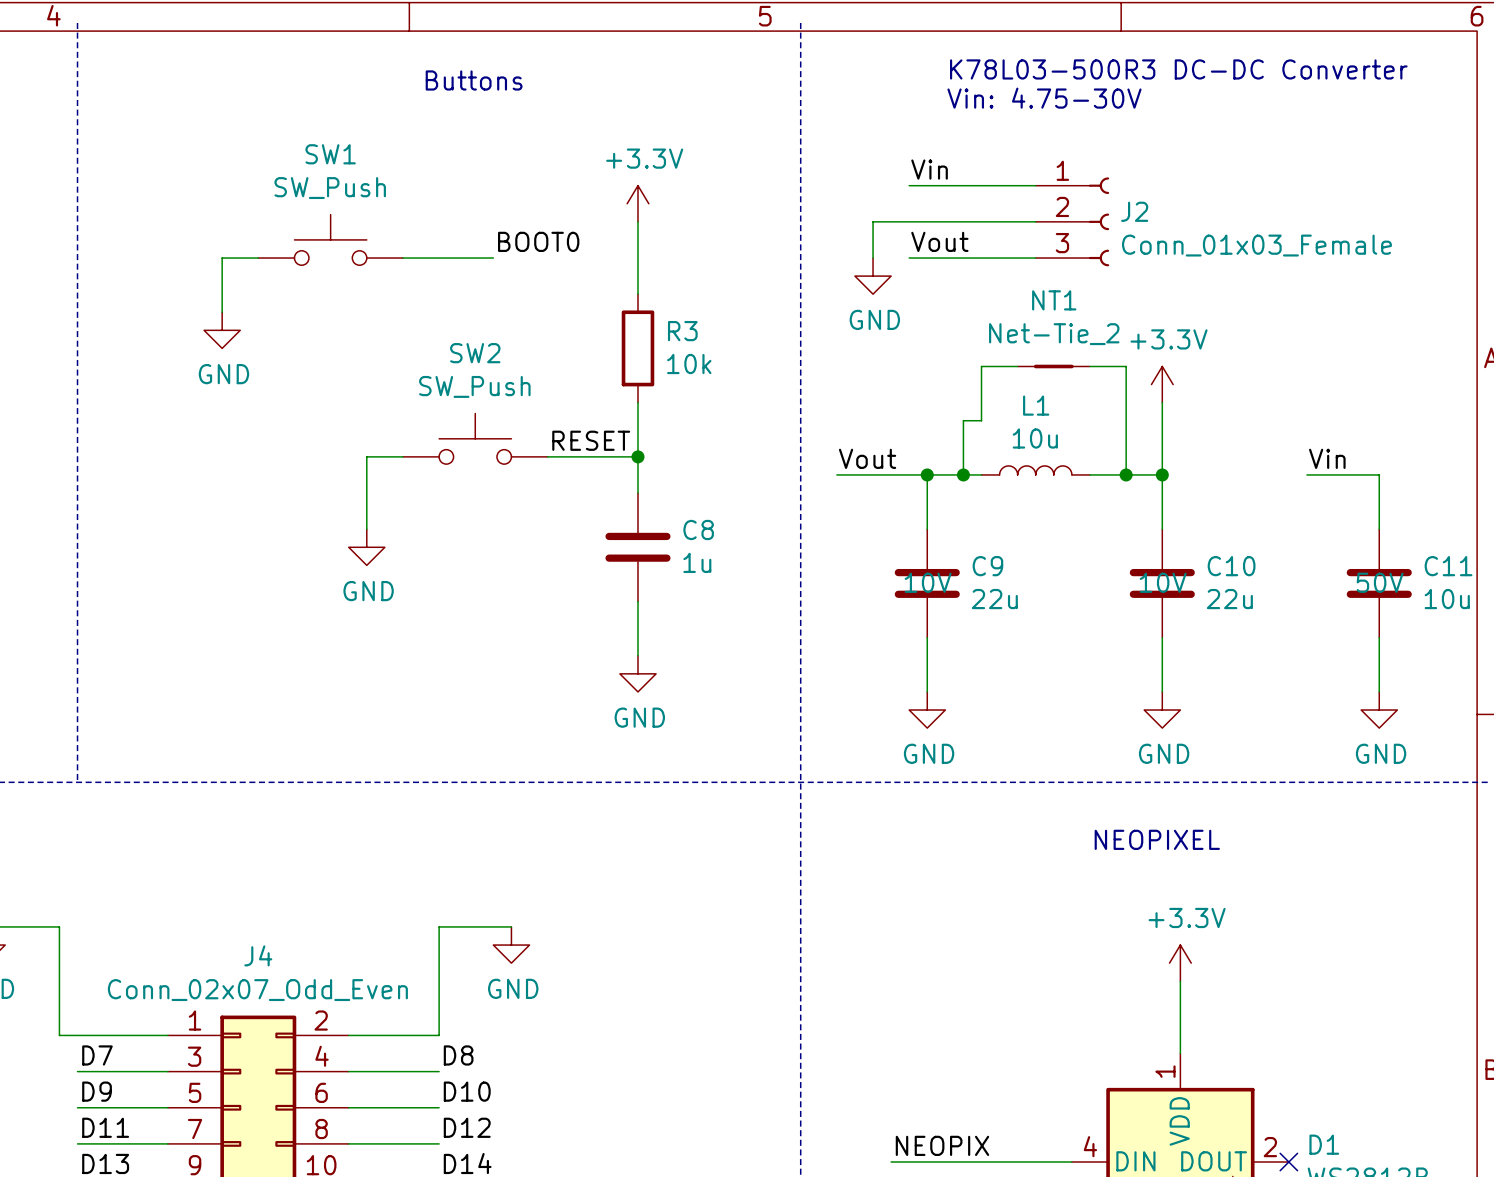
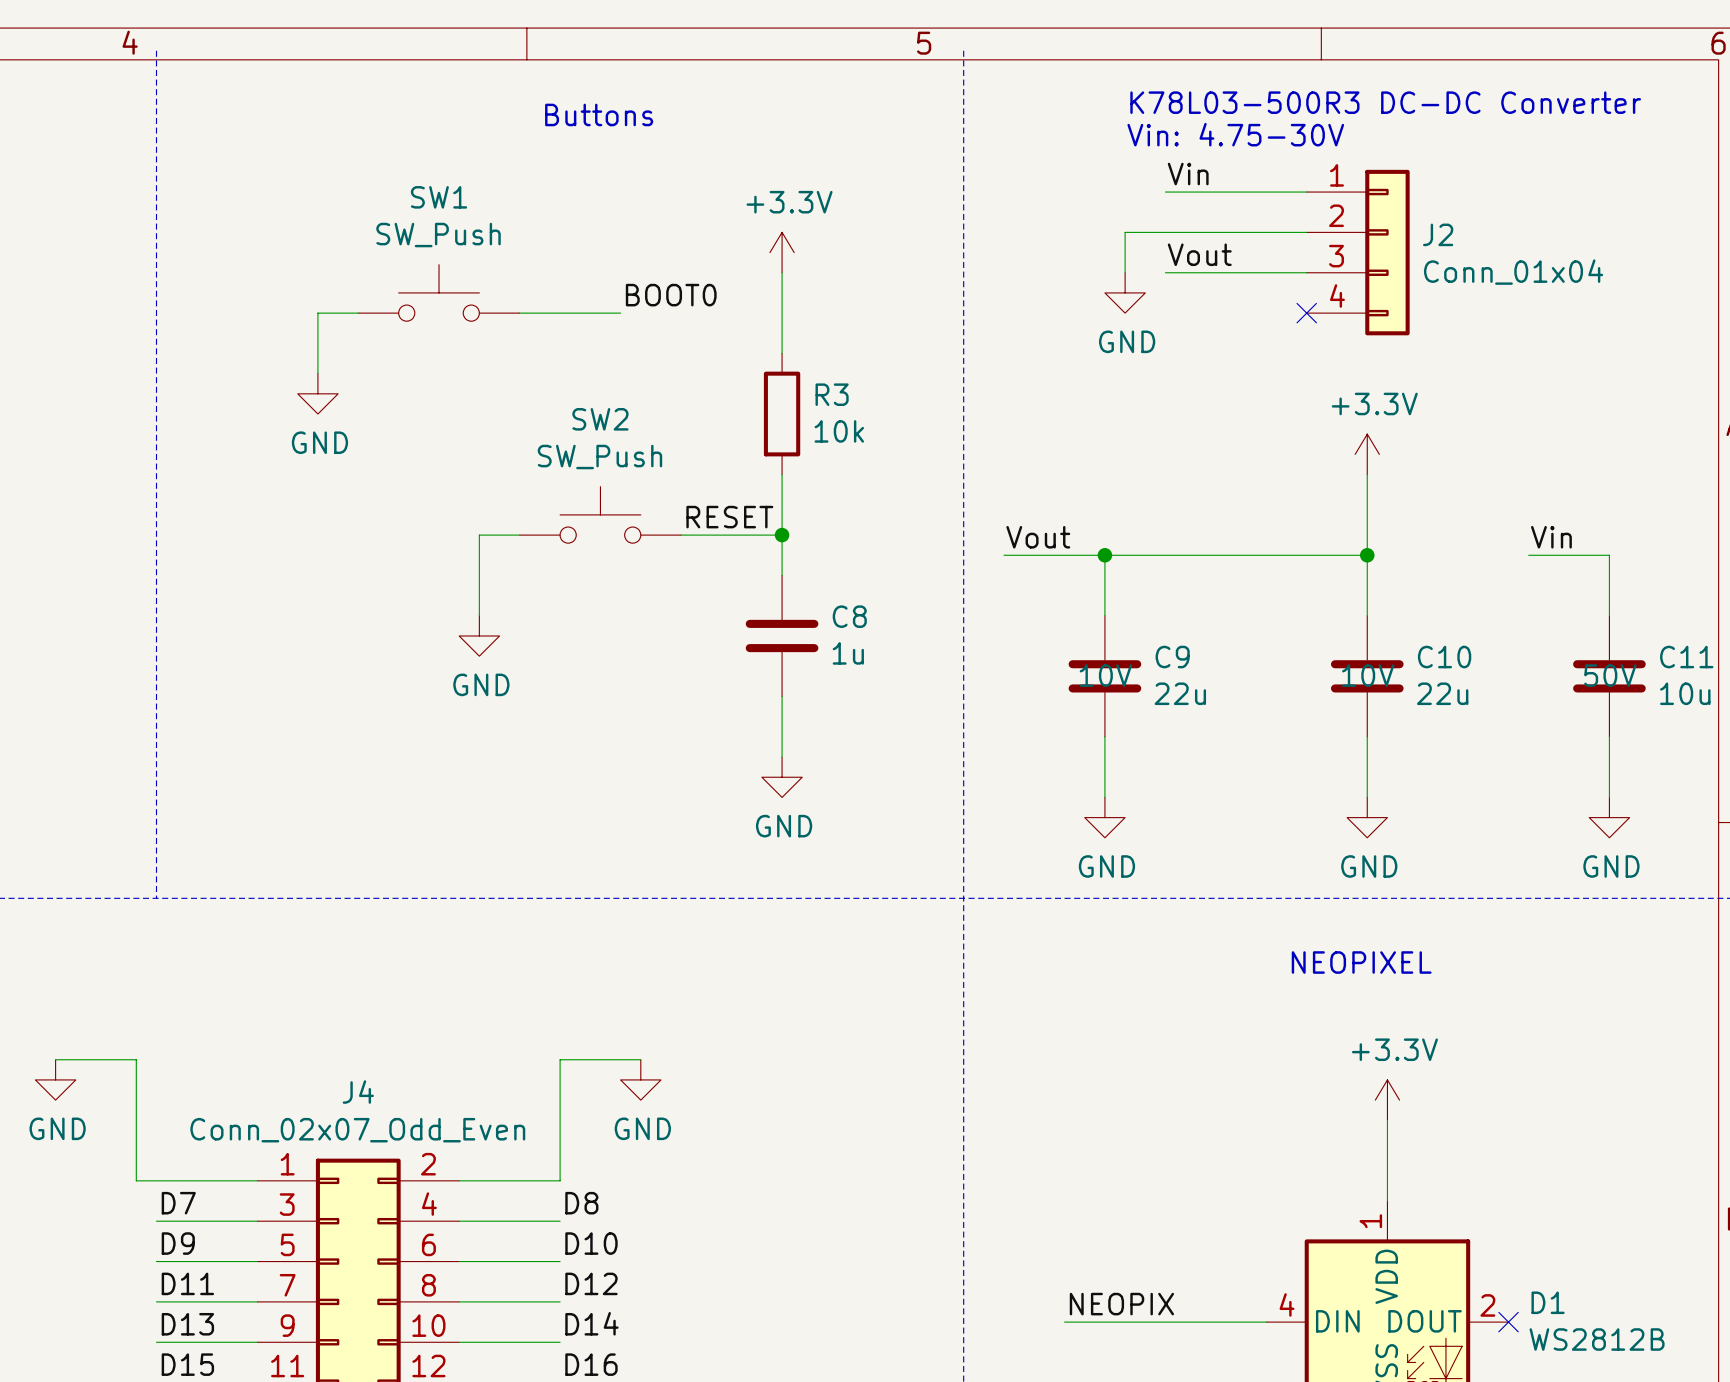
label position: Vin (929, 169) -> Vin (1188, 174)
J2 symbol: [1035, 177, 1110, 267] -> [1306, 169, 1410, 336]
wire: (909, 185) (945, 185) -> (1125, 272) (1125, 232)
wire: (981, 221) (873, 221) (873, 258) -> none
label position: Vout (939, 241) -> Vout (1199, 254)
J2 value: Conn_01x03_Female (1256, 245) -> Conn_01x04 (1513, 272)
wire: (909, 258) (1035, 258) -> (1165, 192) (1306, 192)
no-connect mark: none -> (1306, 313)
power symbol position: GND (873, 276) -> GND (1125, 292)
wire: (1017, 366) (981, 366) (981, 420) (963, 420) (963, 474) -> none
NT1: Net-Tie_2 (1053, 366) -> none
wire: (1089, 366) (1126, 366) (1126, 474) -> none
L1: 10u (1035, 470) -> none
junction: (963, 474) -> none
wire: none -> (1165, 555) (1286, 555)
junction: (1126, 474) -> none

